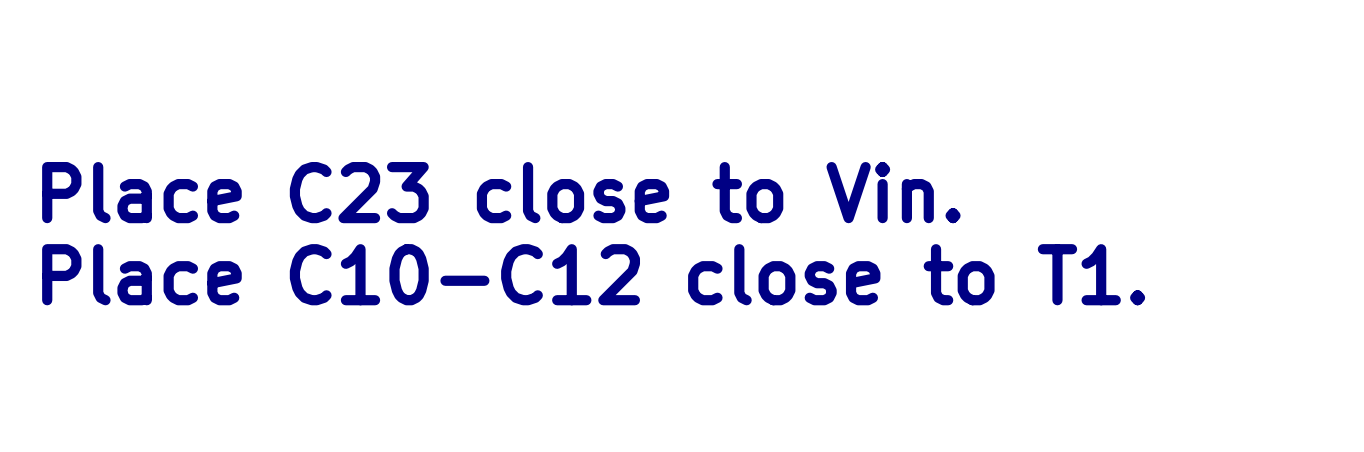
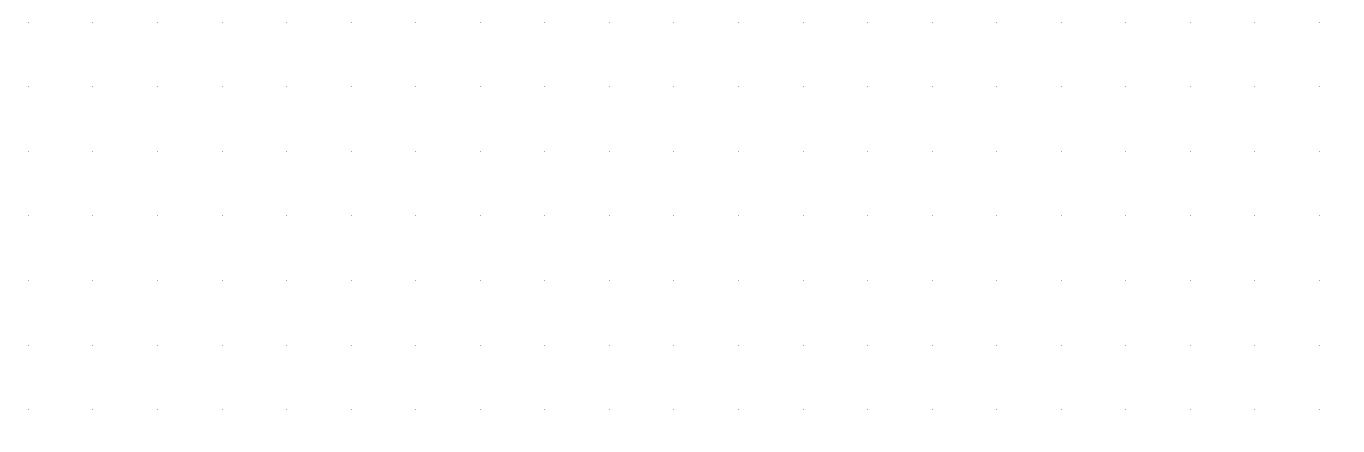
text: Place C23 close to Vin. (501, 192) -> none
text: Place C10-C12 close to T1. (593, 274) -> none

